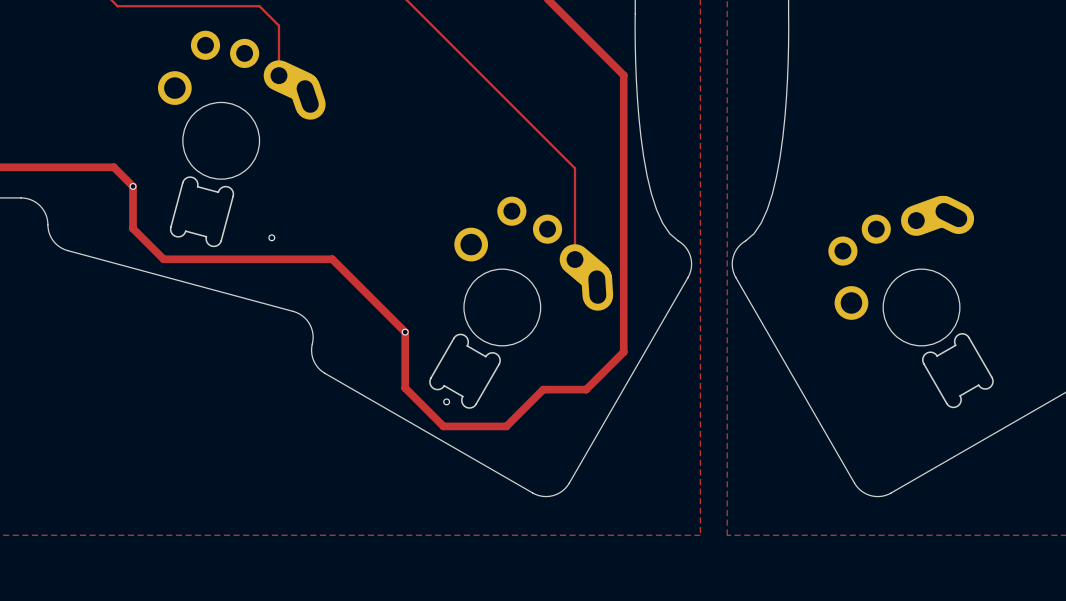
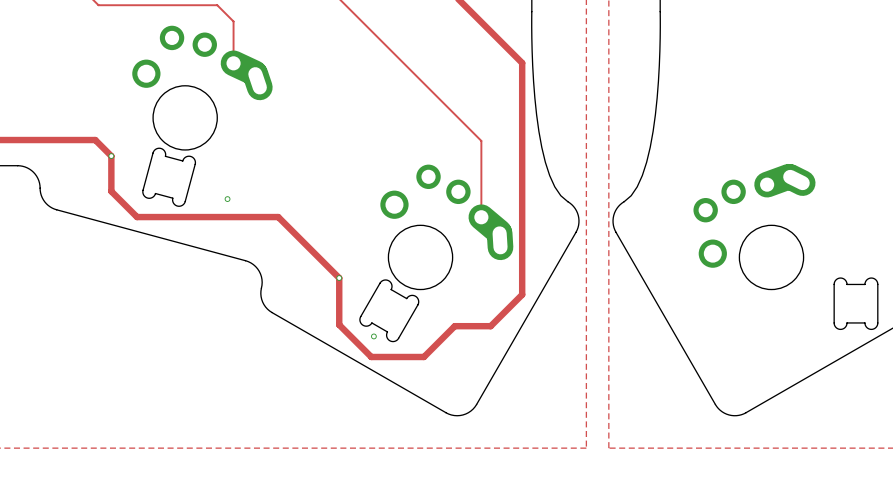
part: none -> (855, 303)
part: (957, 370) -> none

